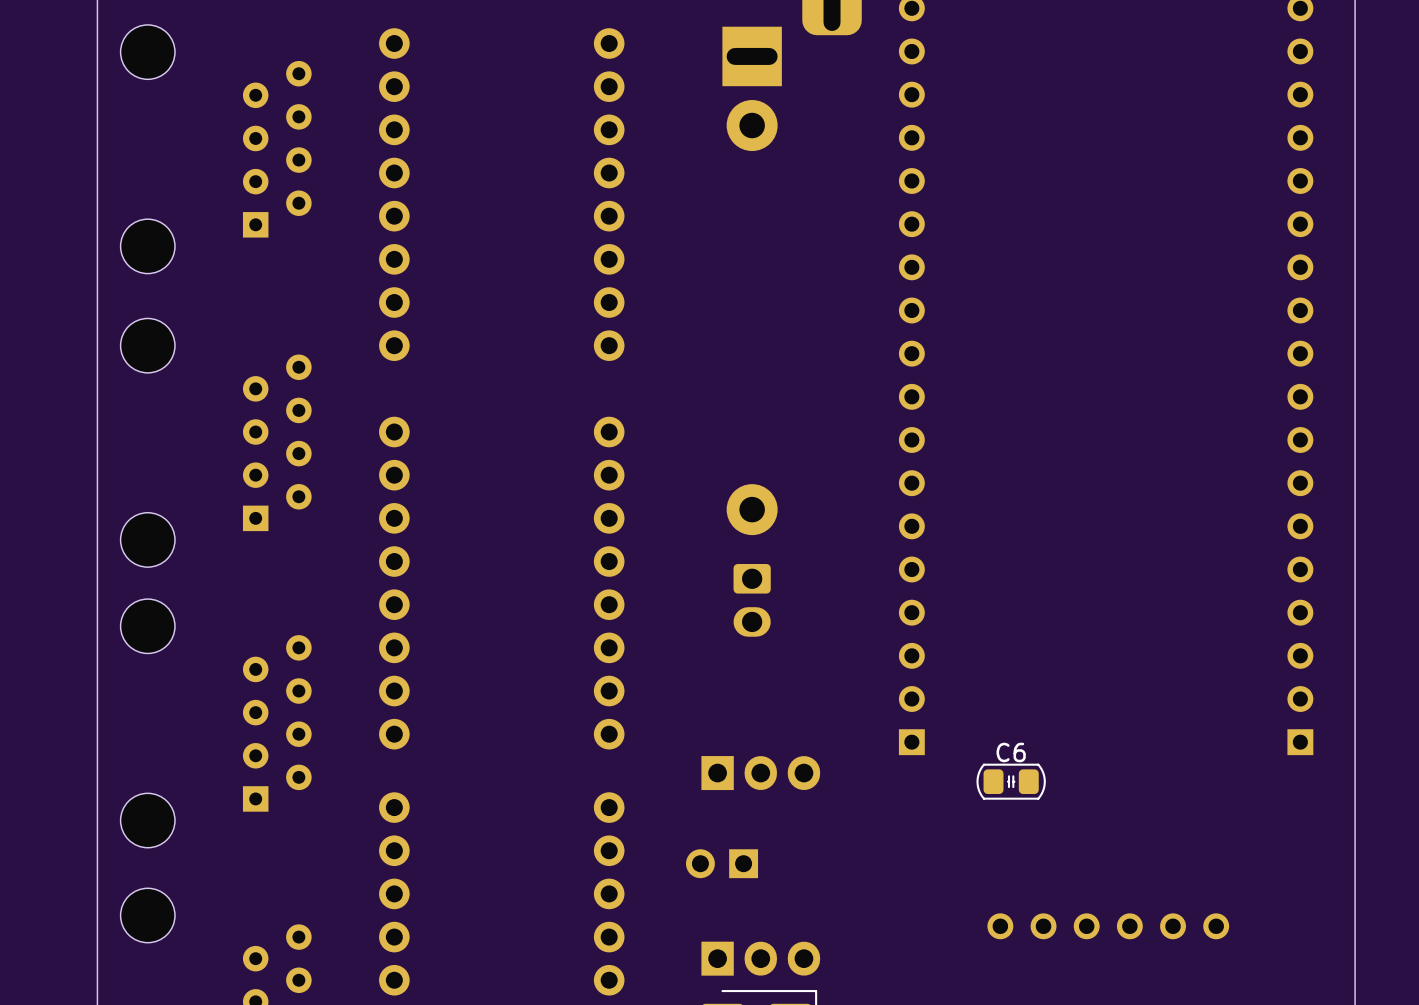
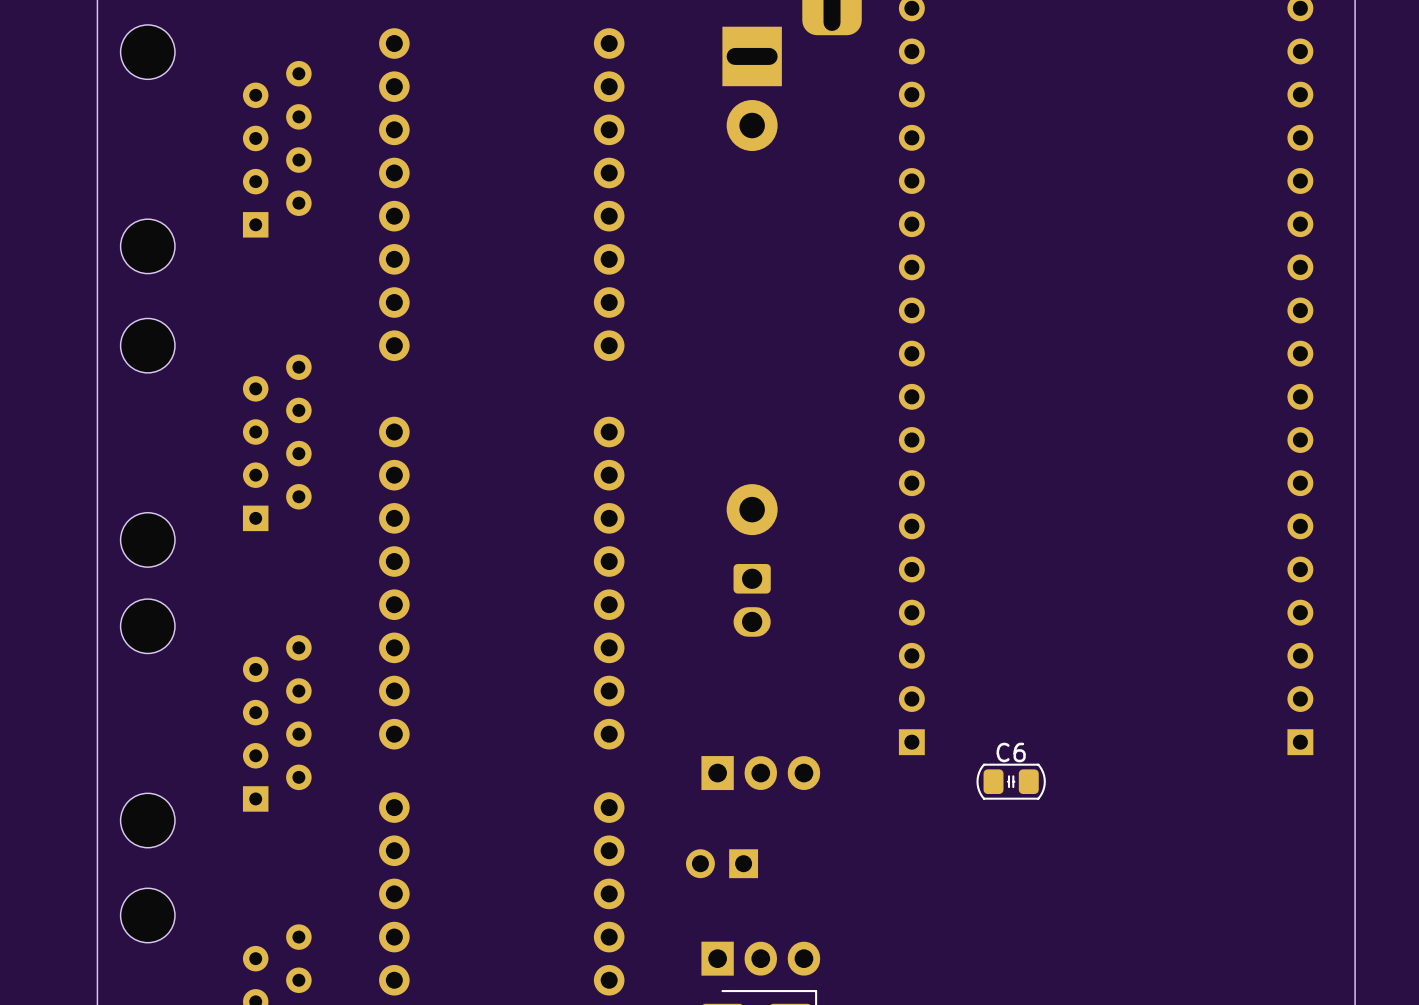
part: (1108, 926) -> none

